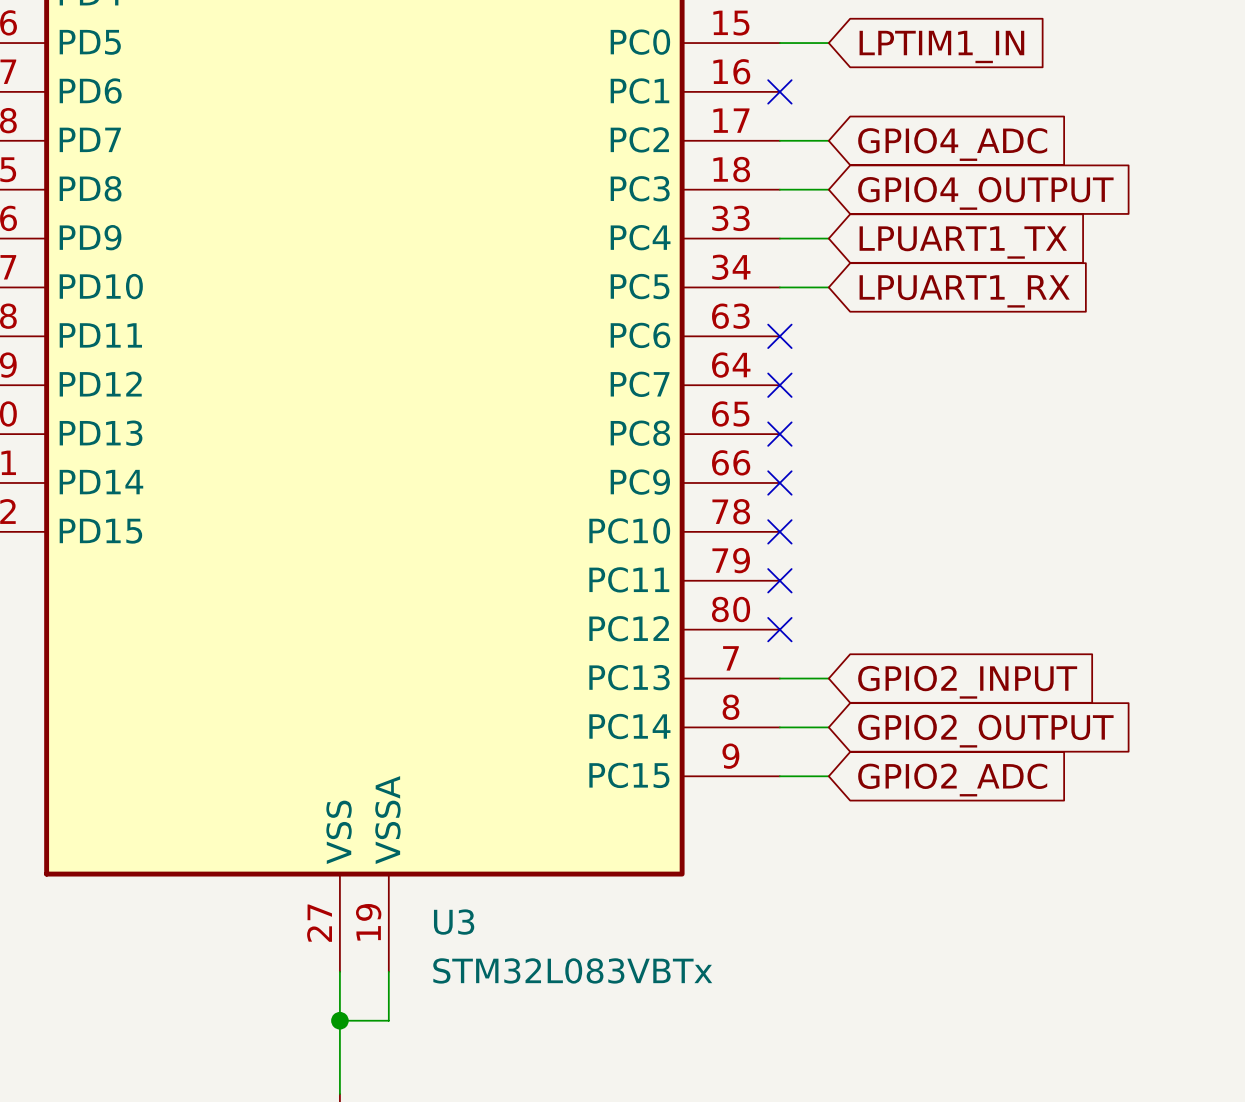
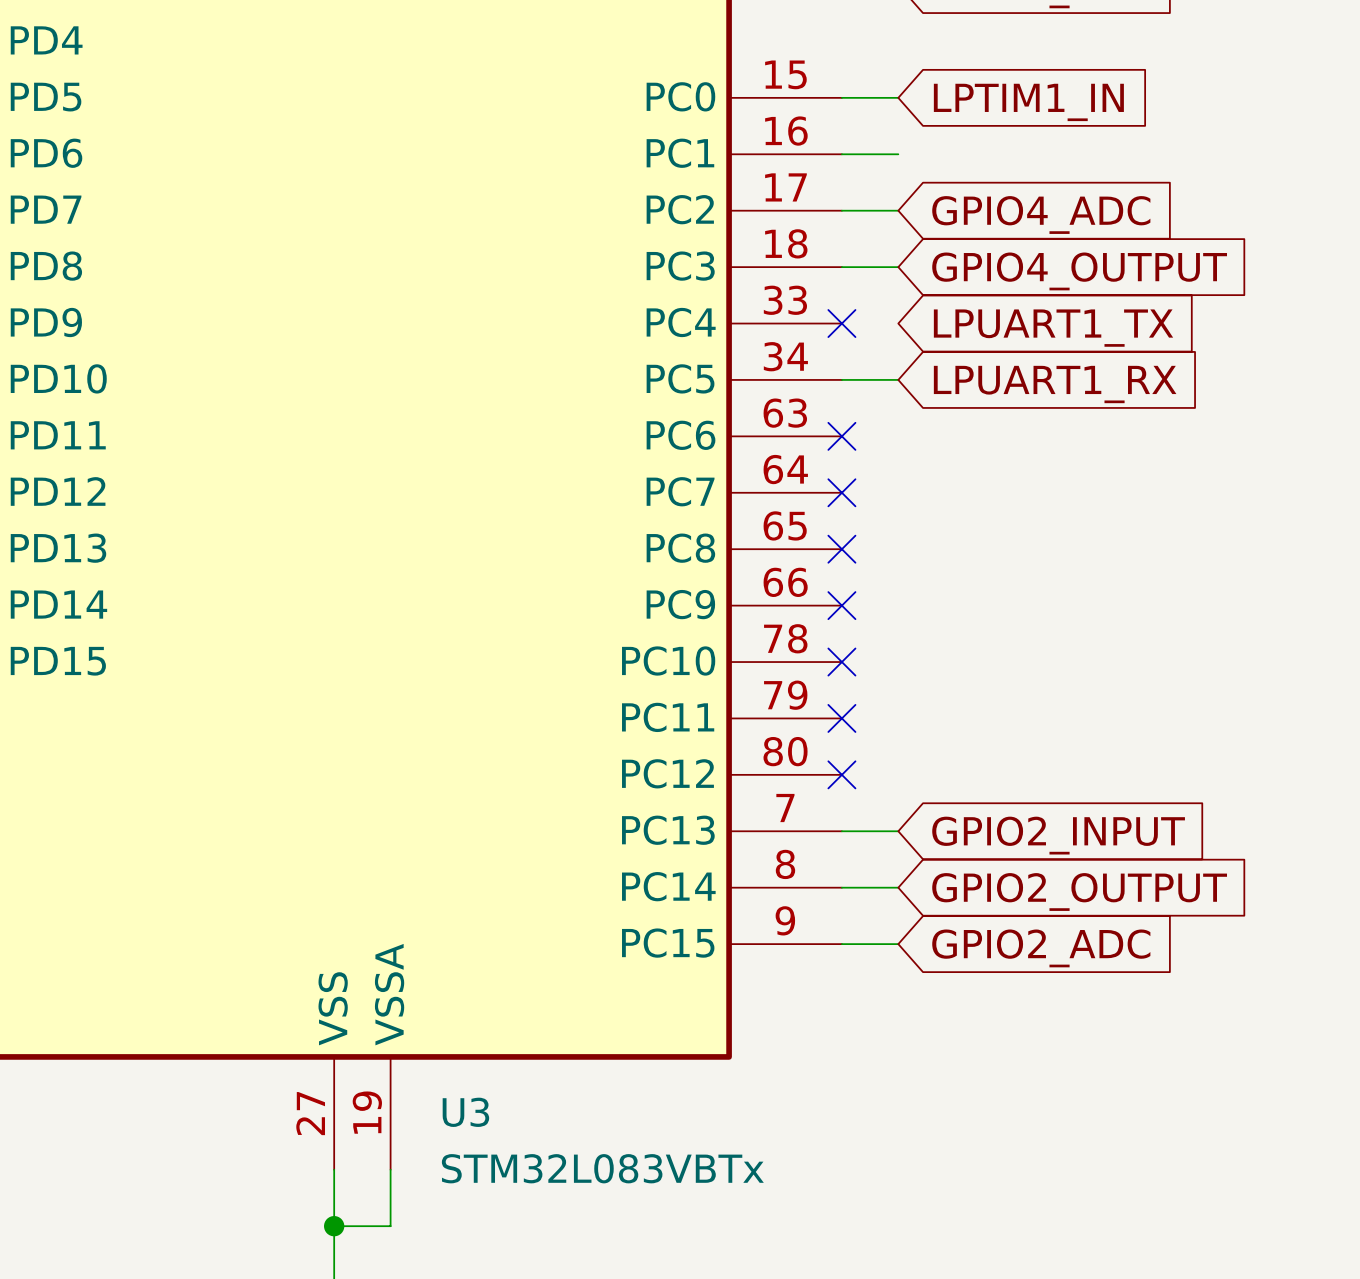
no-connect mark: (779, 91) -> none
wire: (779, 238) (828, 238) -> (841, 154) (898, 154)
no-connect mark: none -> (841, 323)

